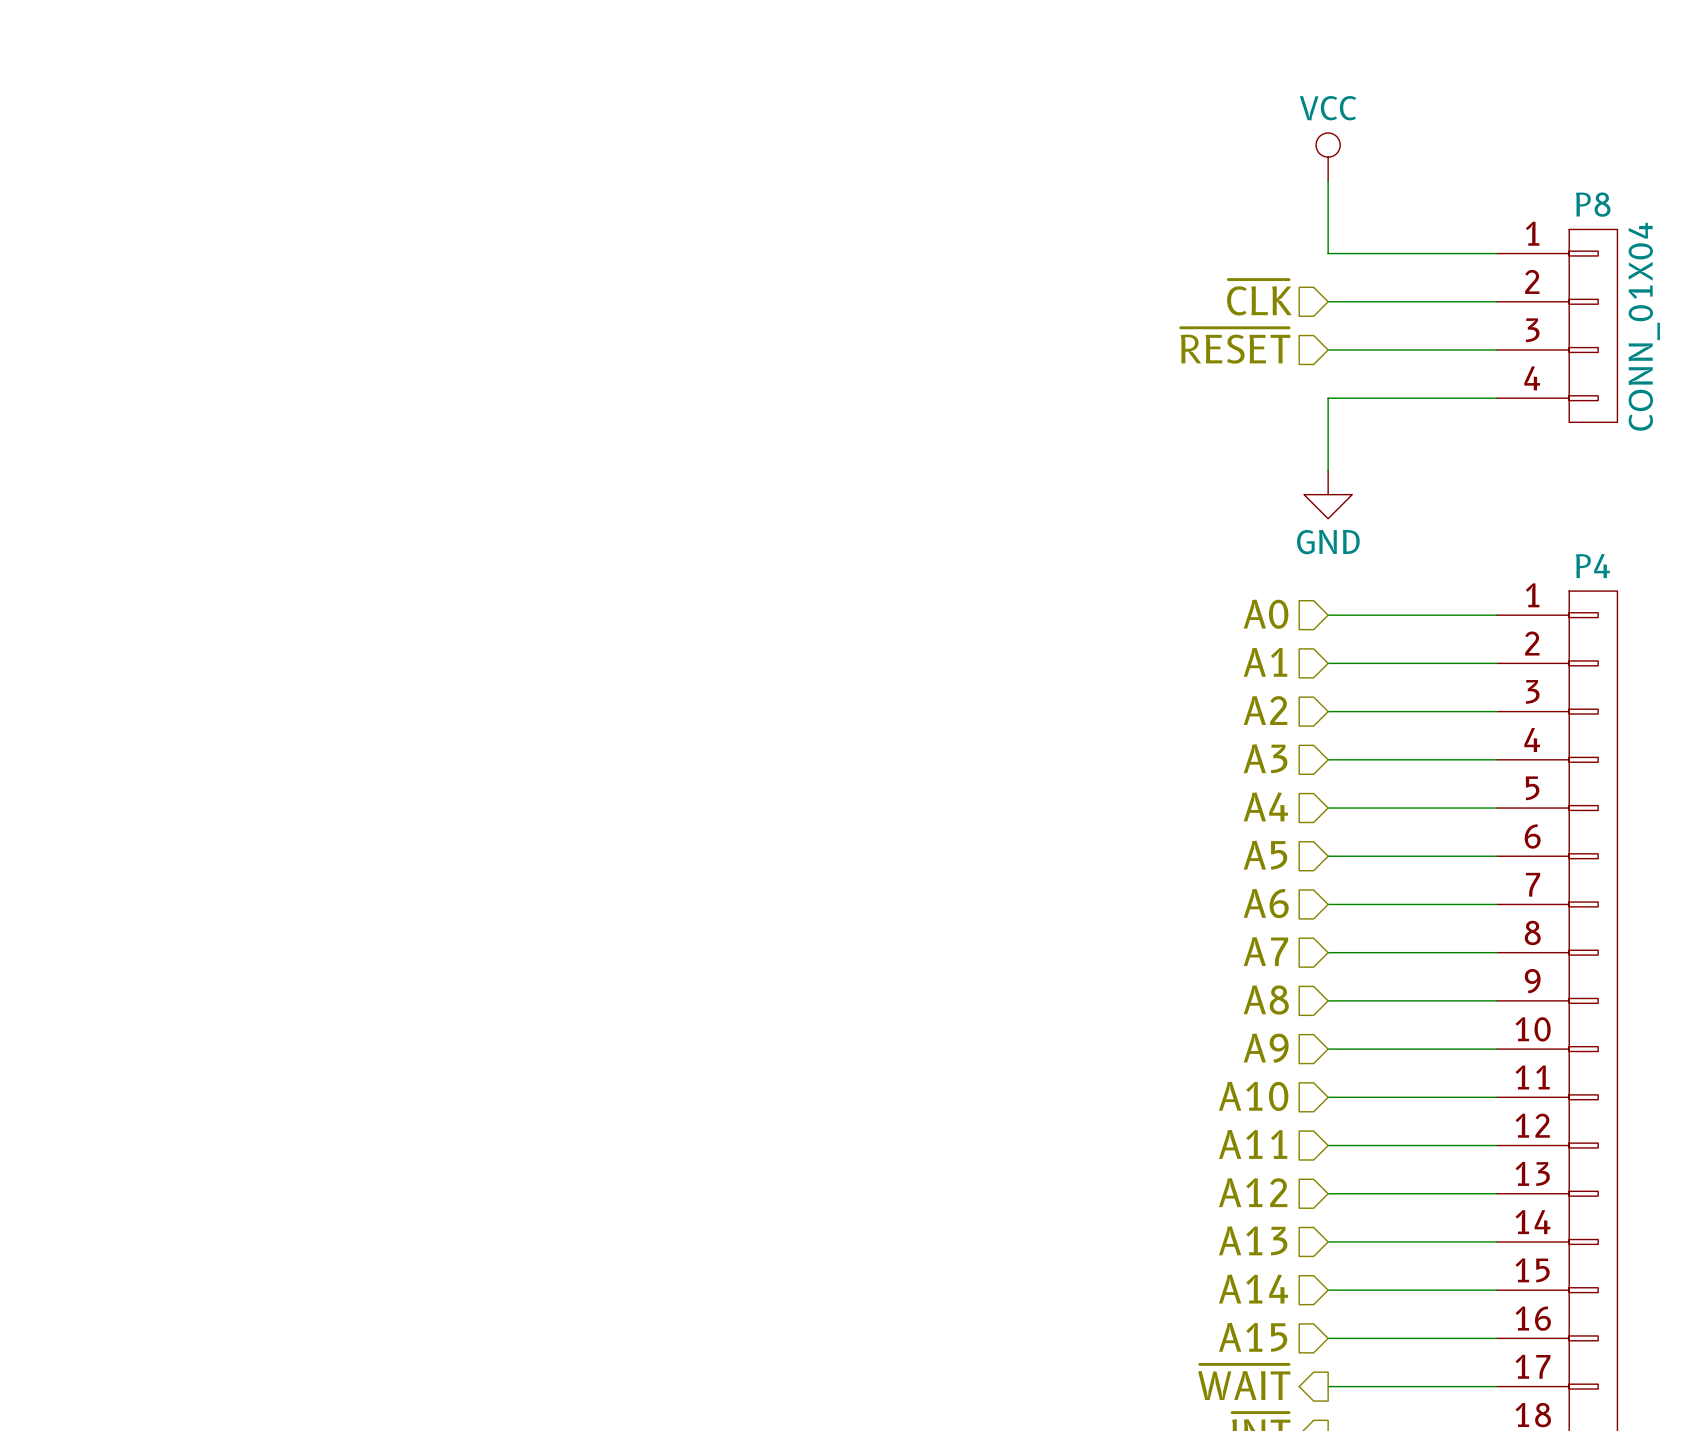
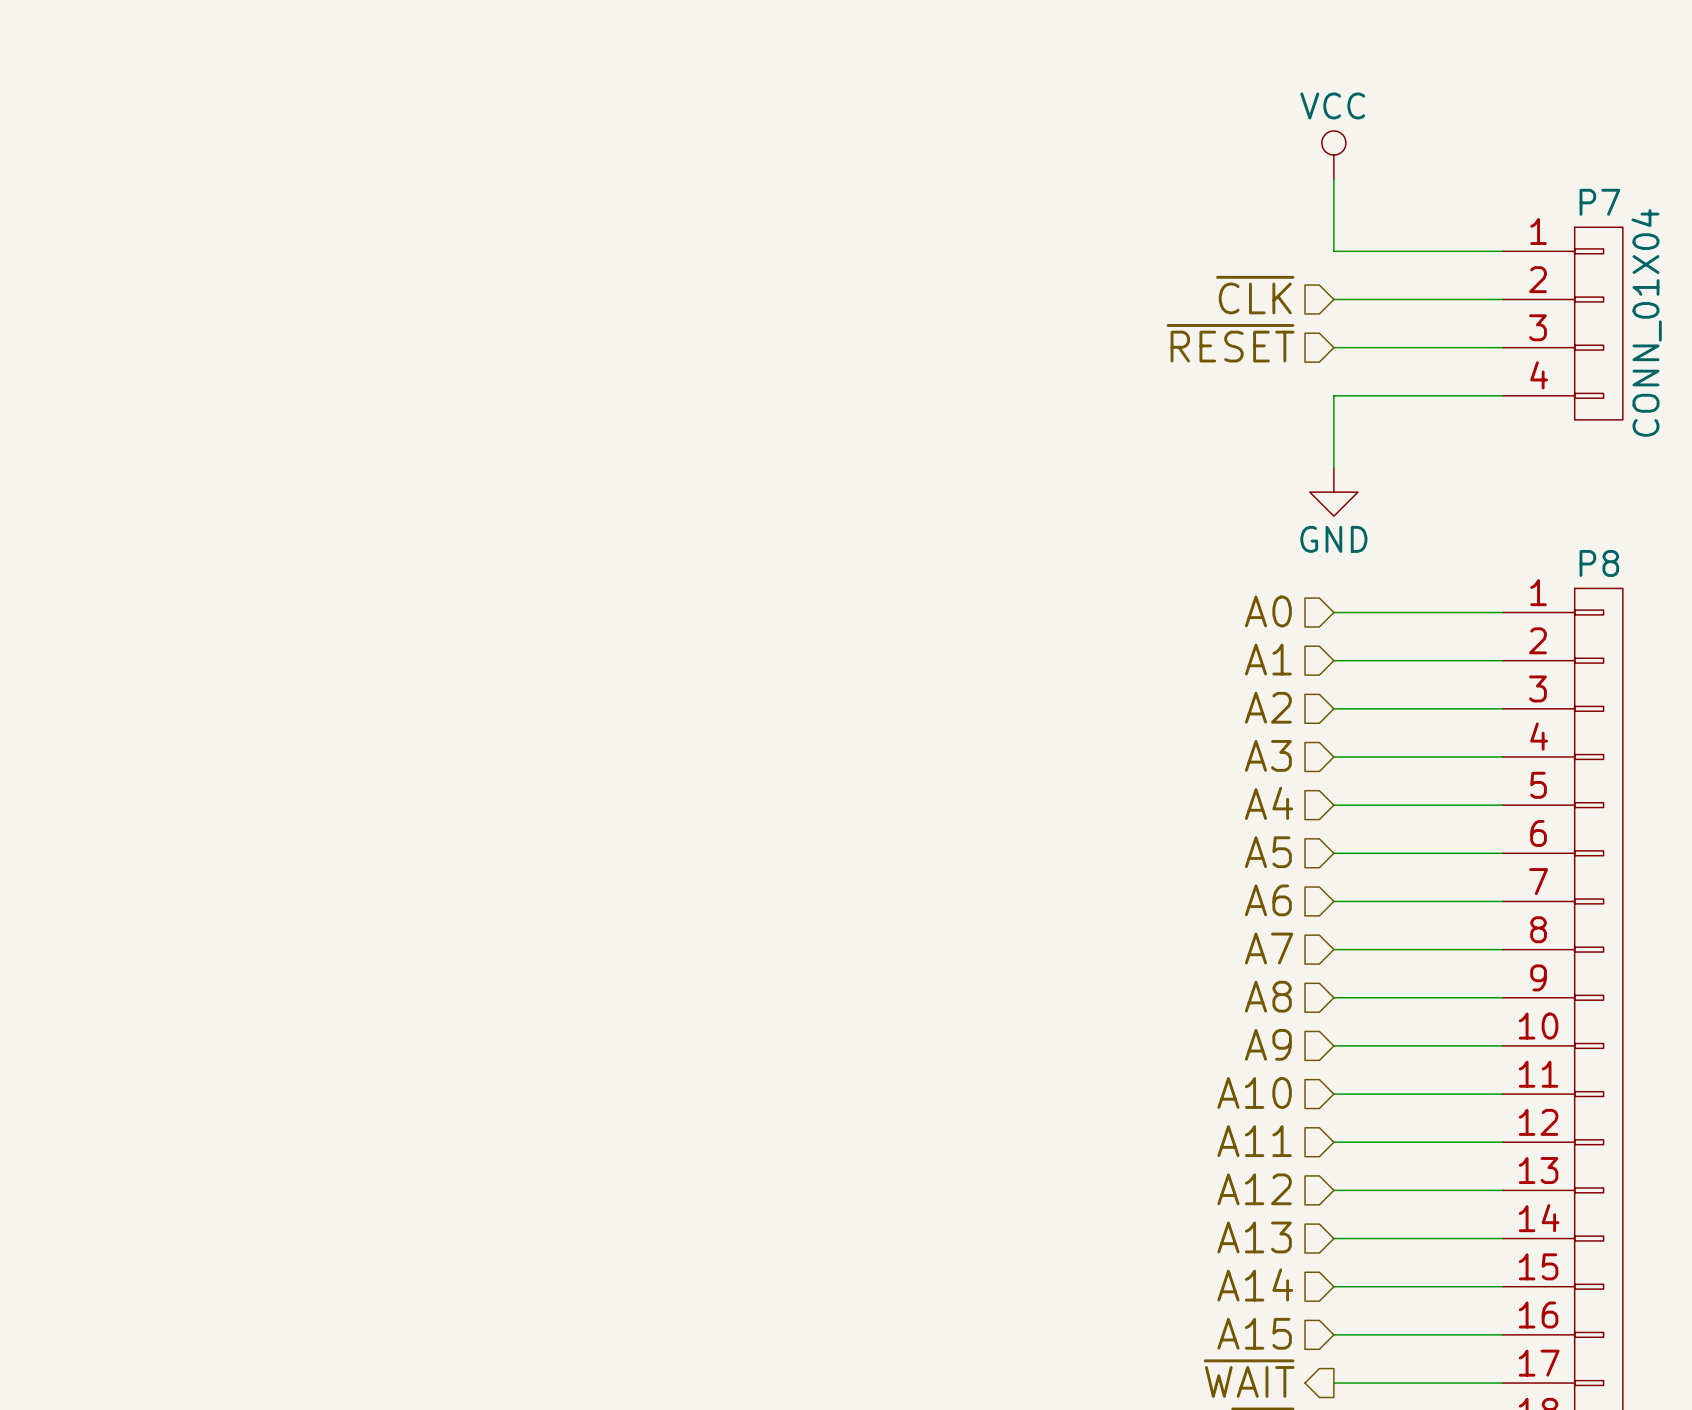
P8 name: P8 (1593, 204) -> P7 (1599, 202)
P4 name: P4 (1592, 566) -> P8 (1599, 563)

